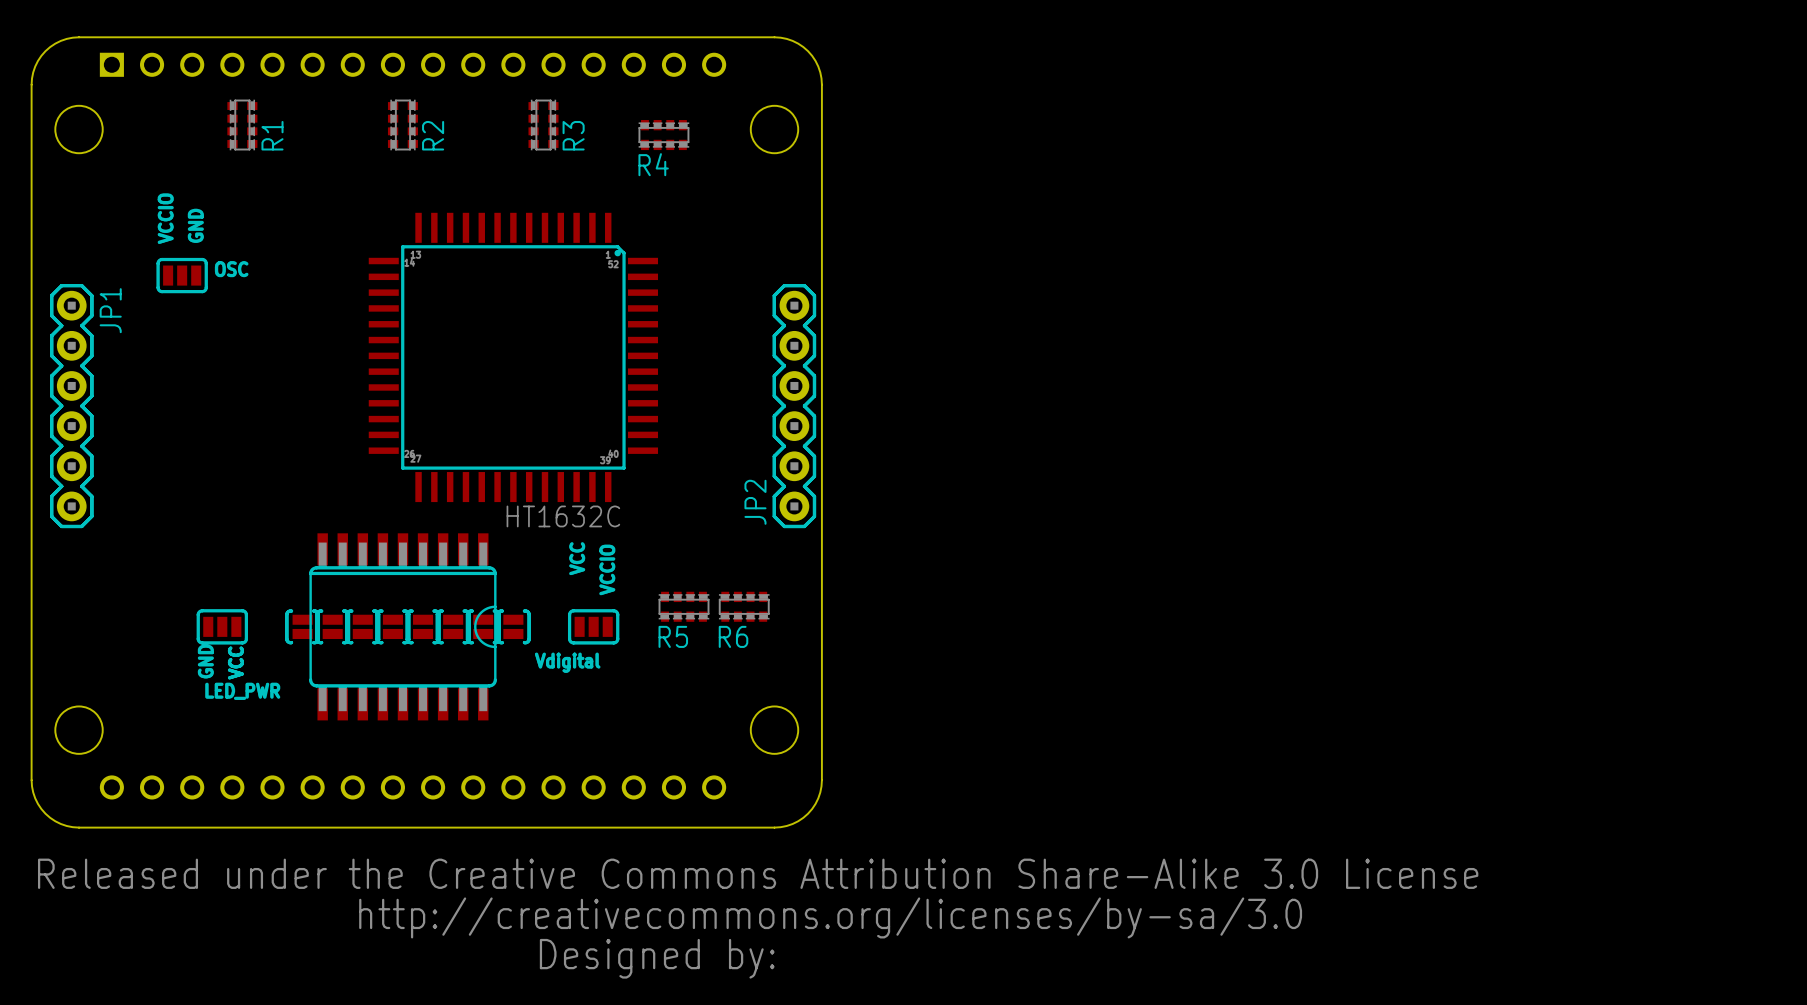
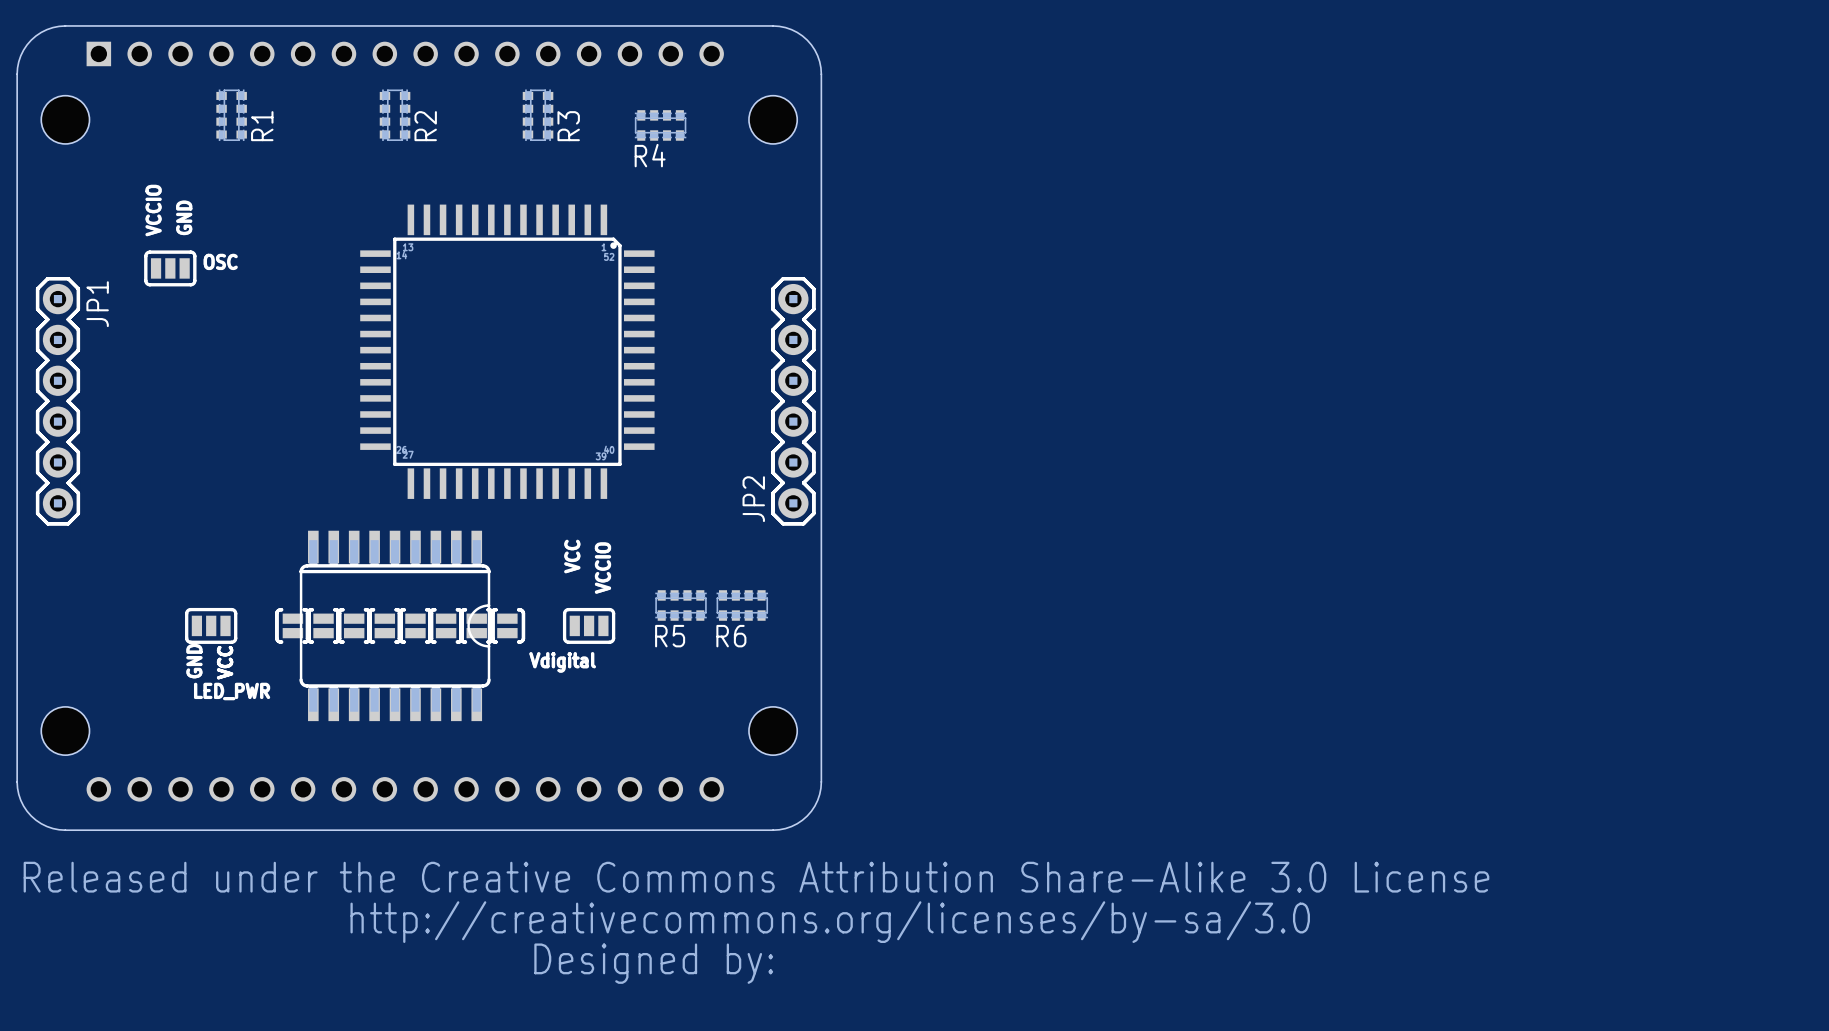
part value: HT1632C (563, 516) -> none

